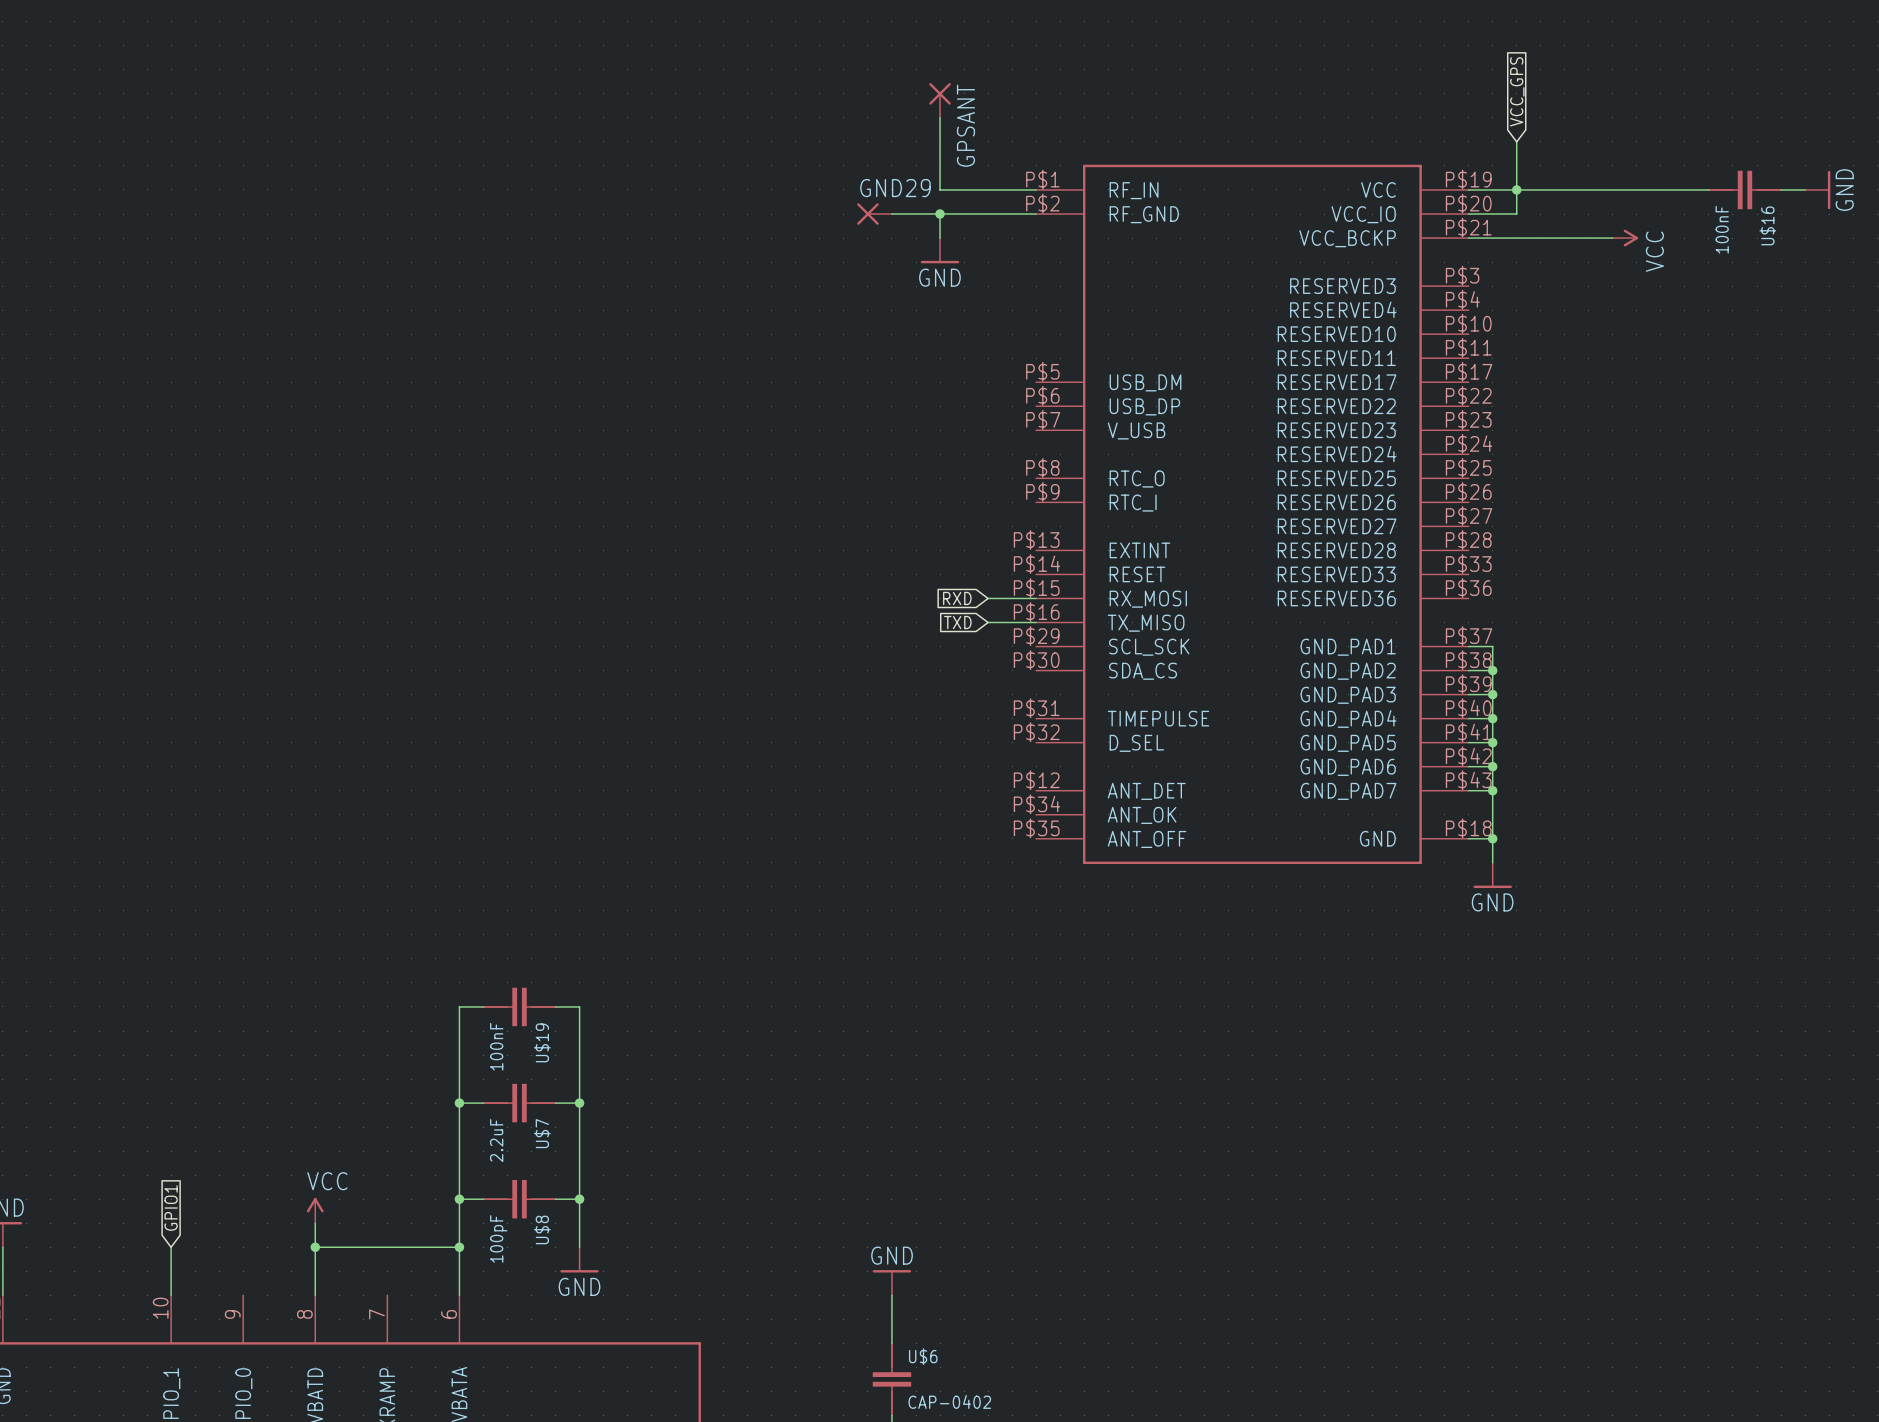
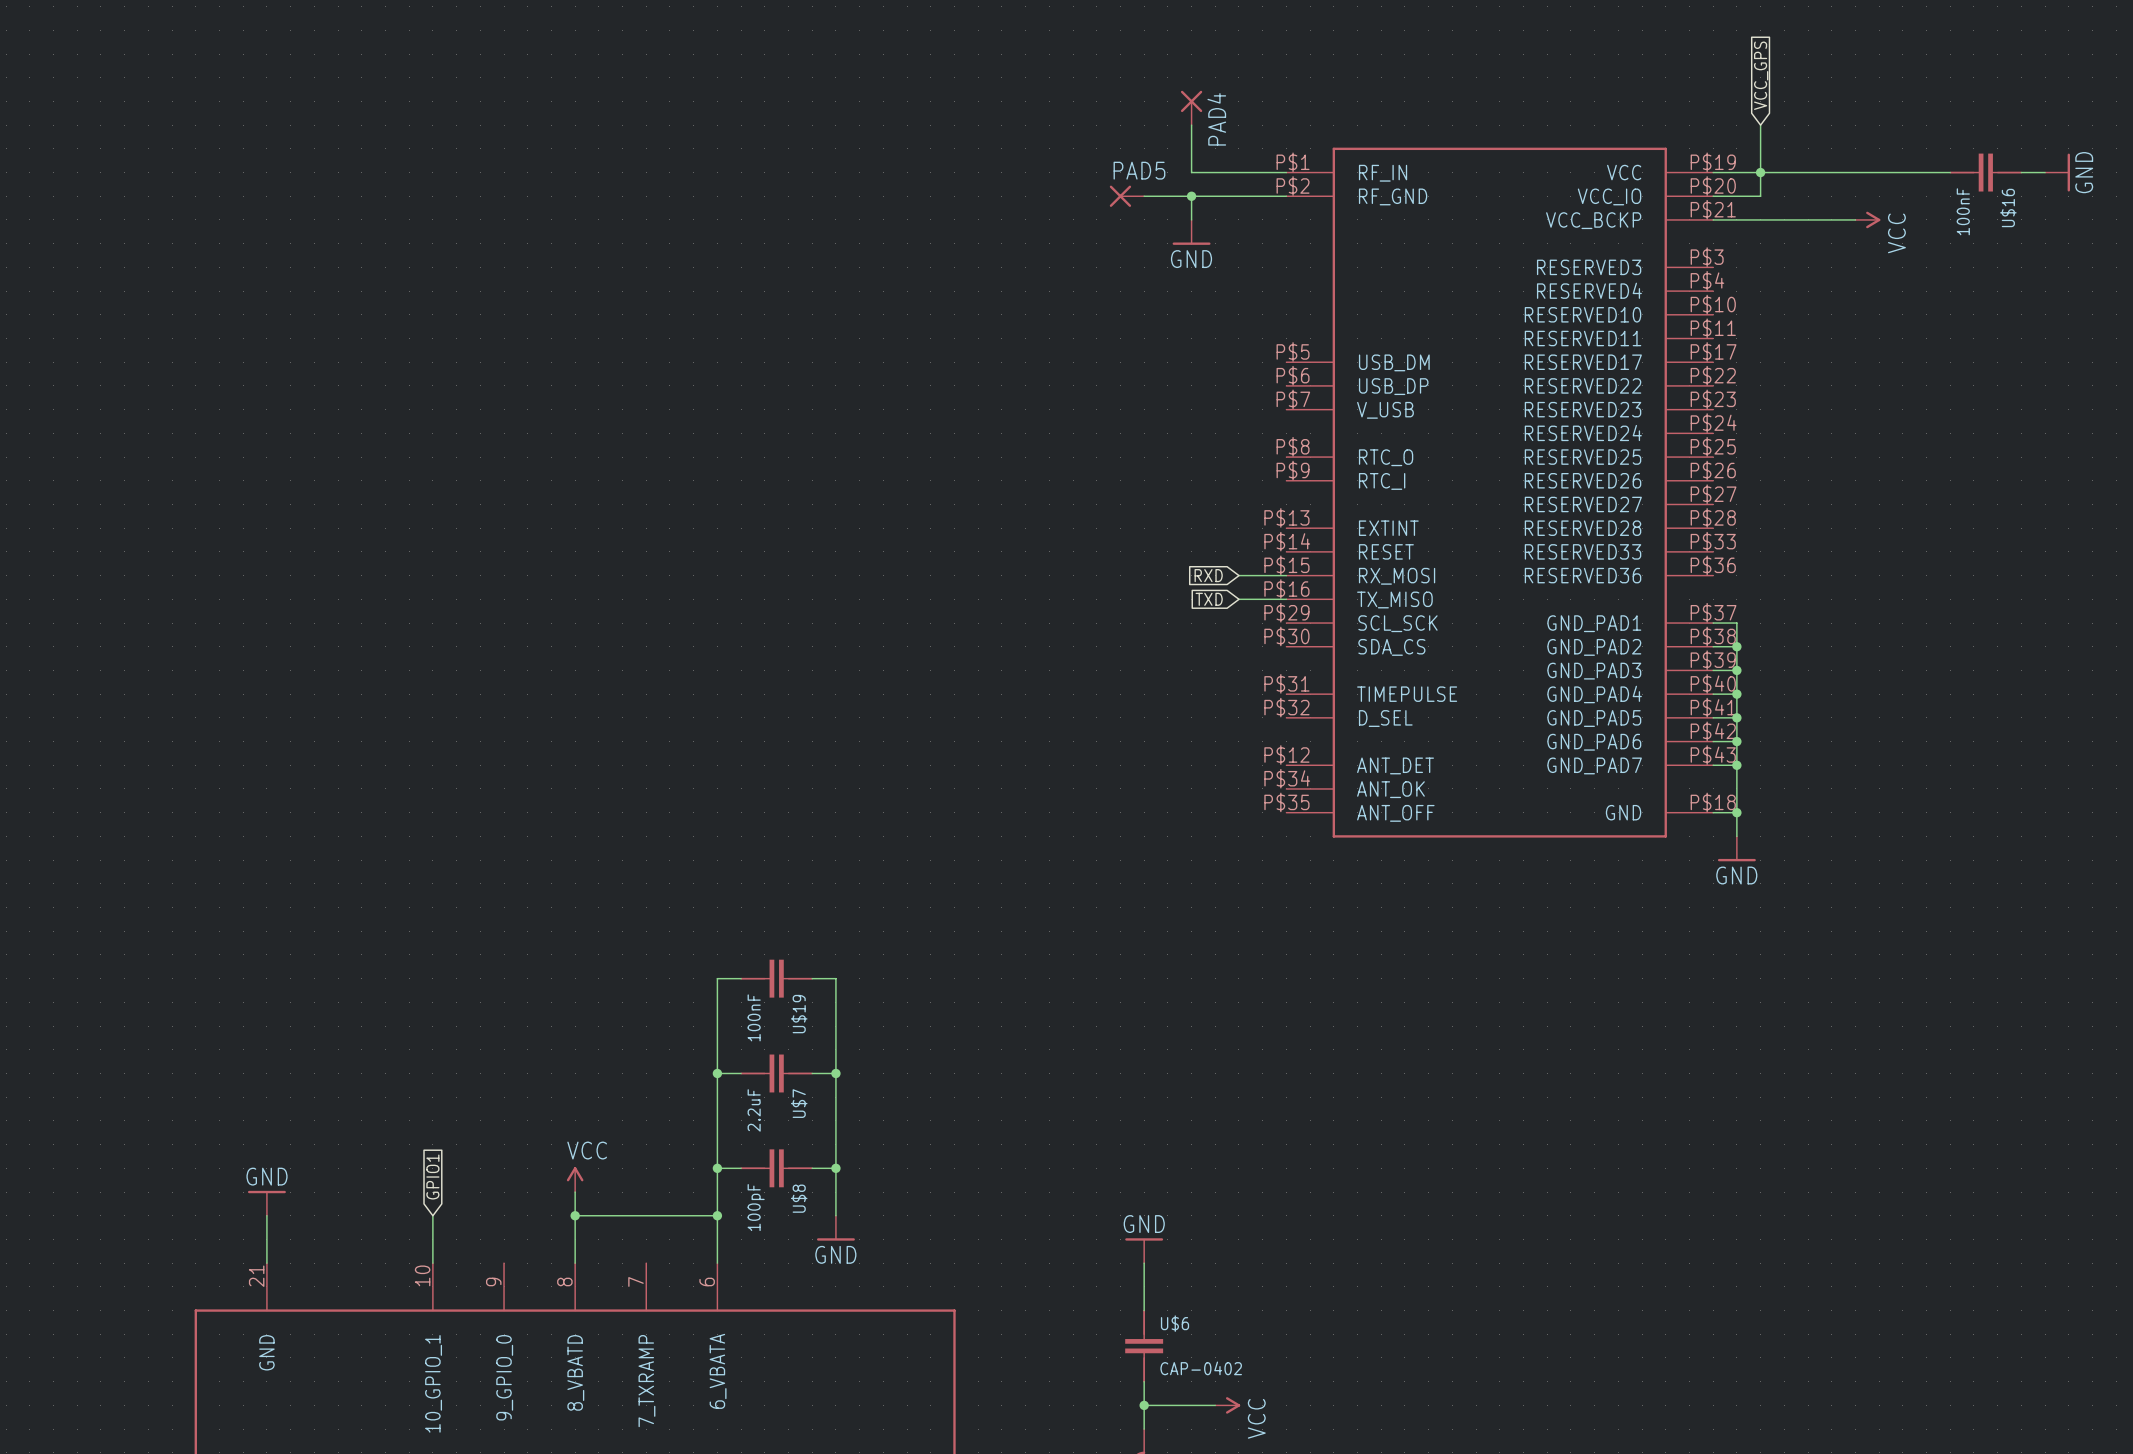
GPSANT: (940, 100) -> none
PAD4: none -> (1191, 107)
GND29 name: GND29 (895, 188) -> PAD5 (1139, 170)

